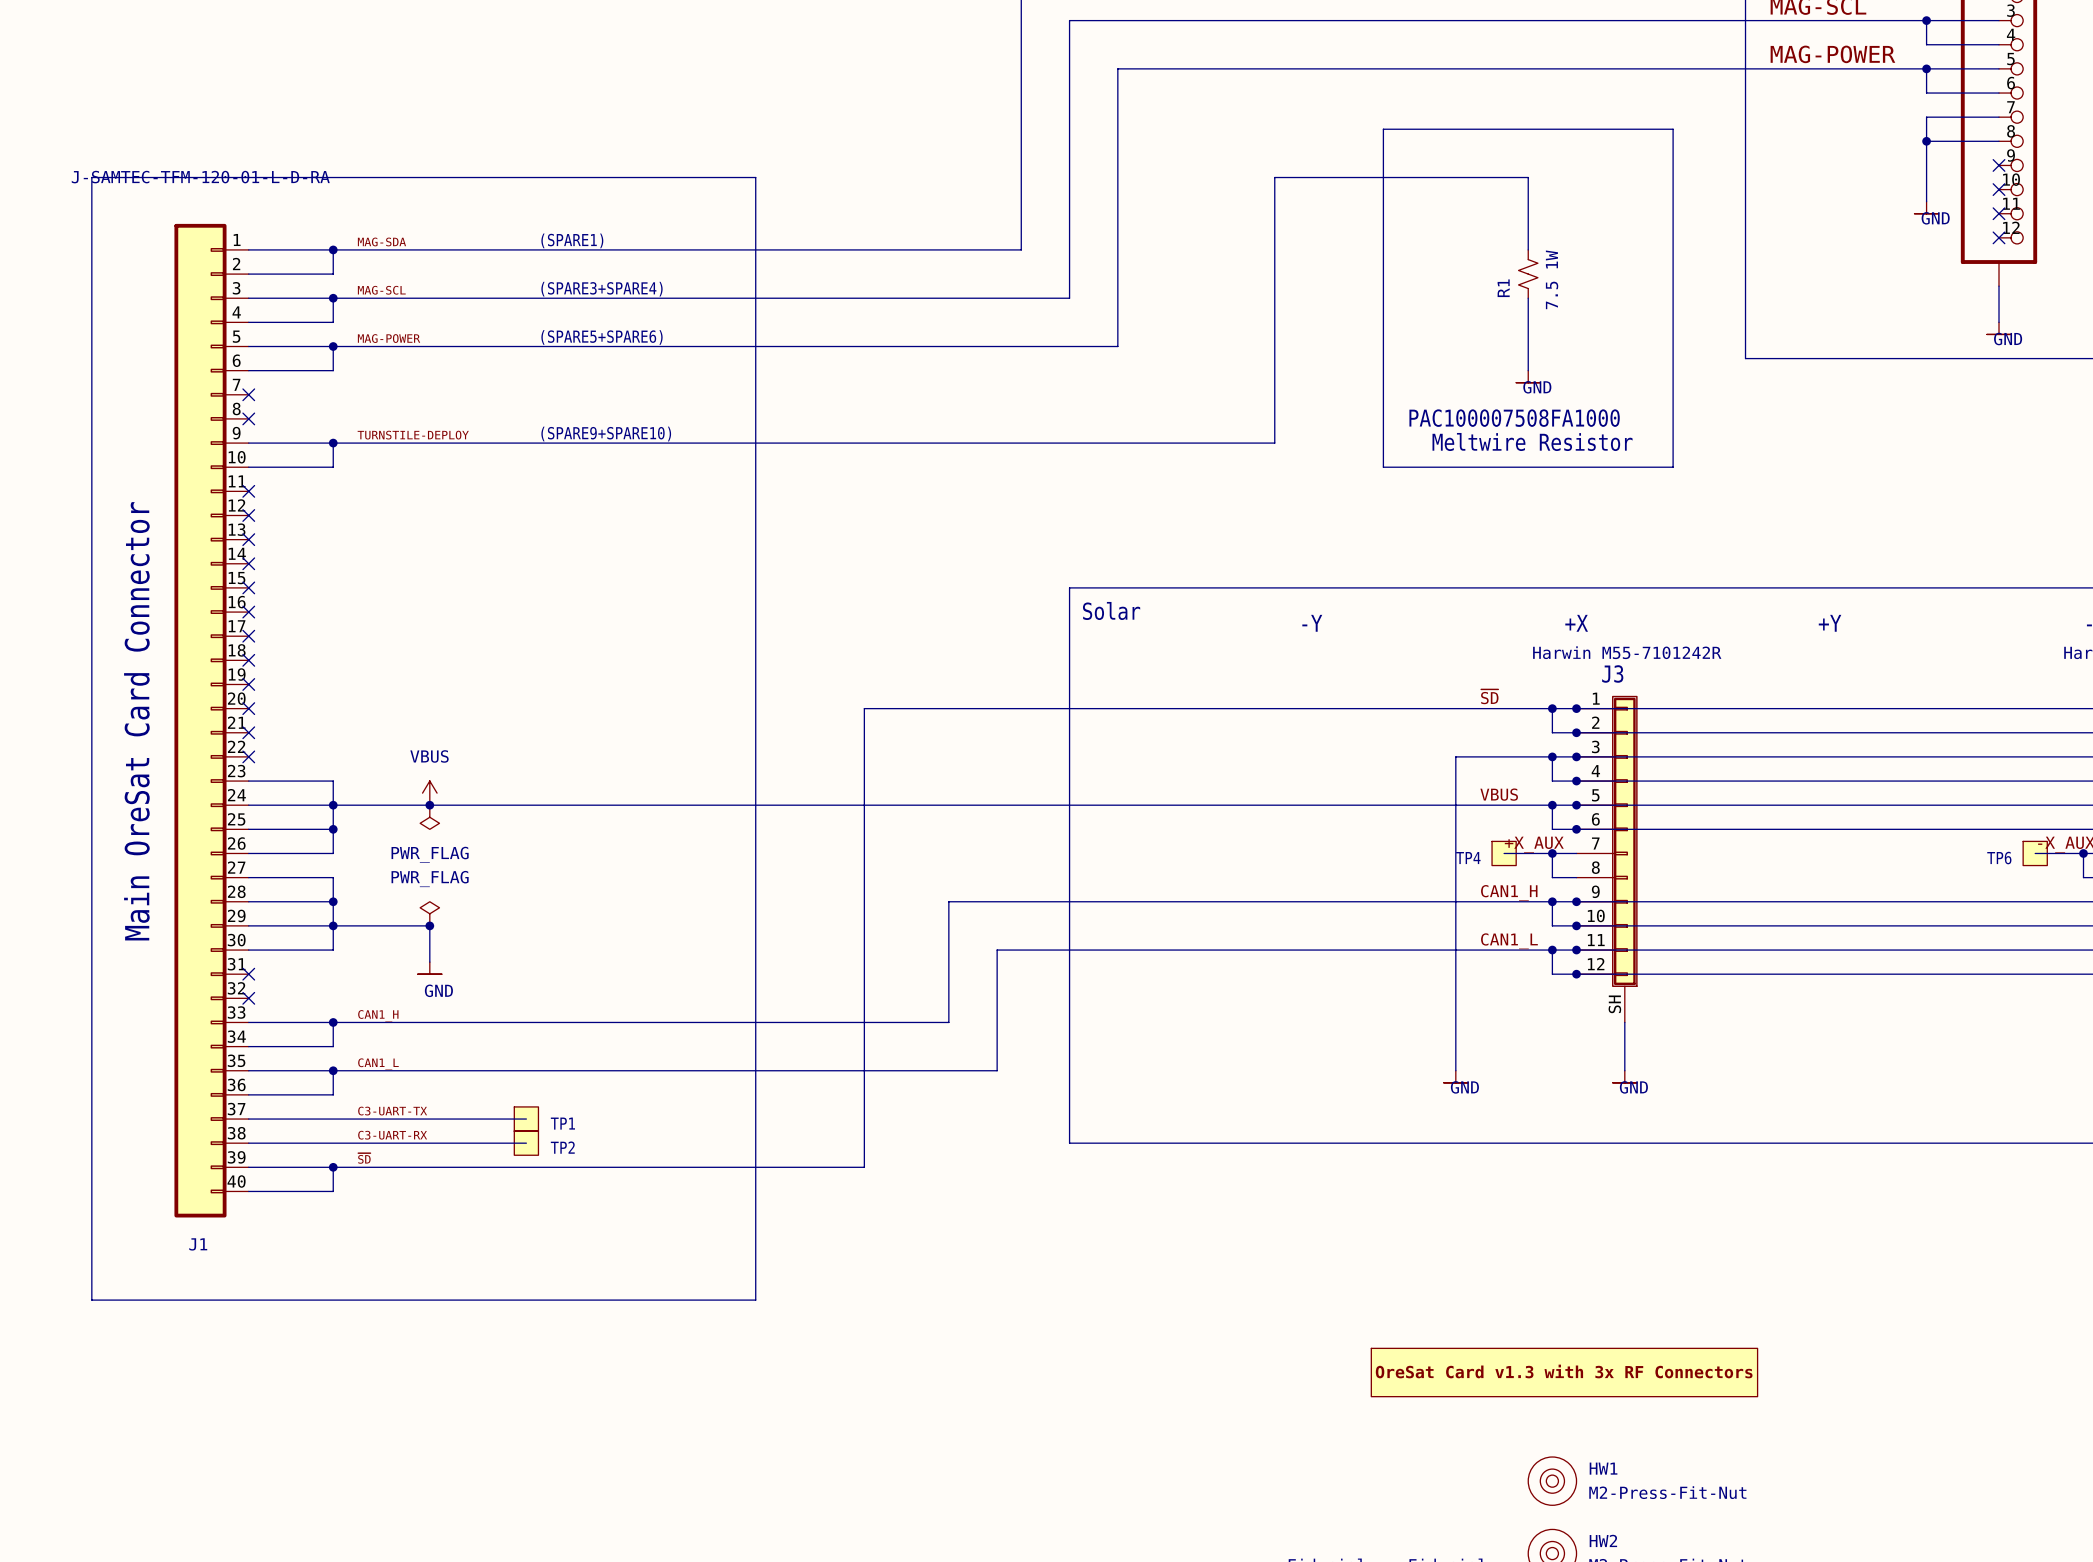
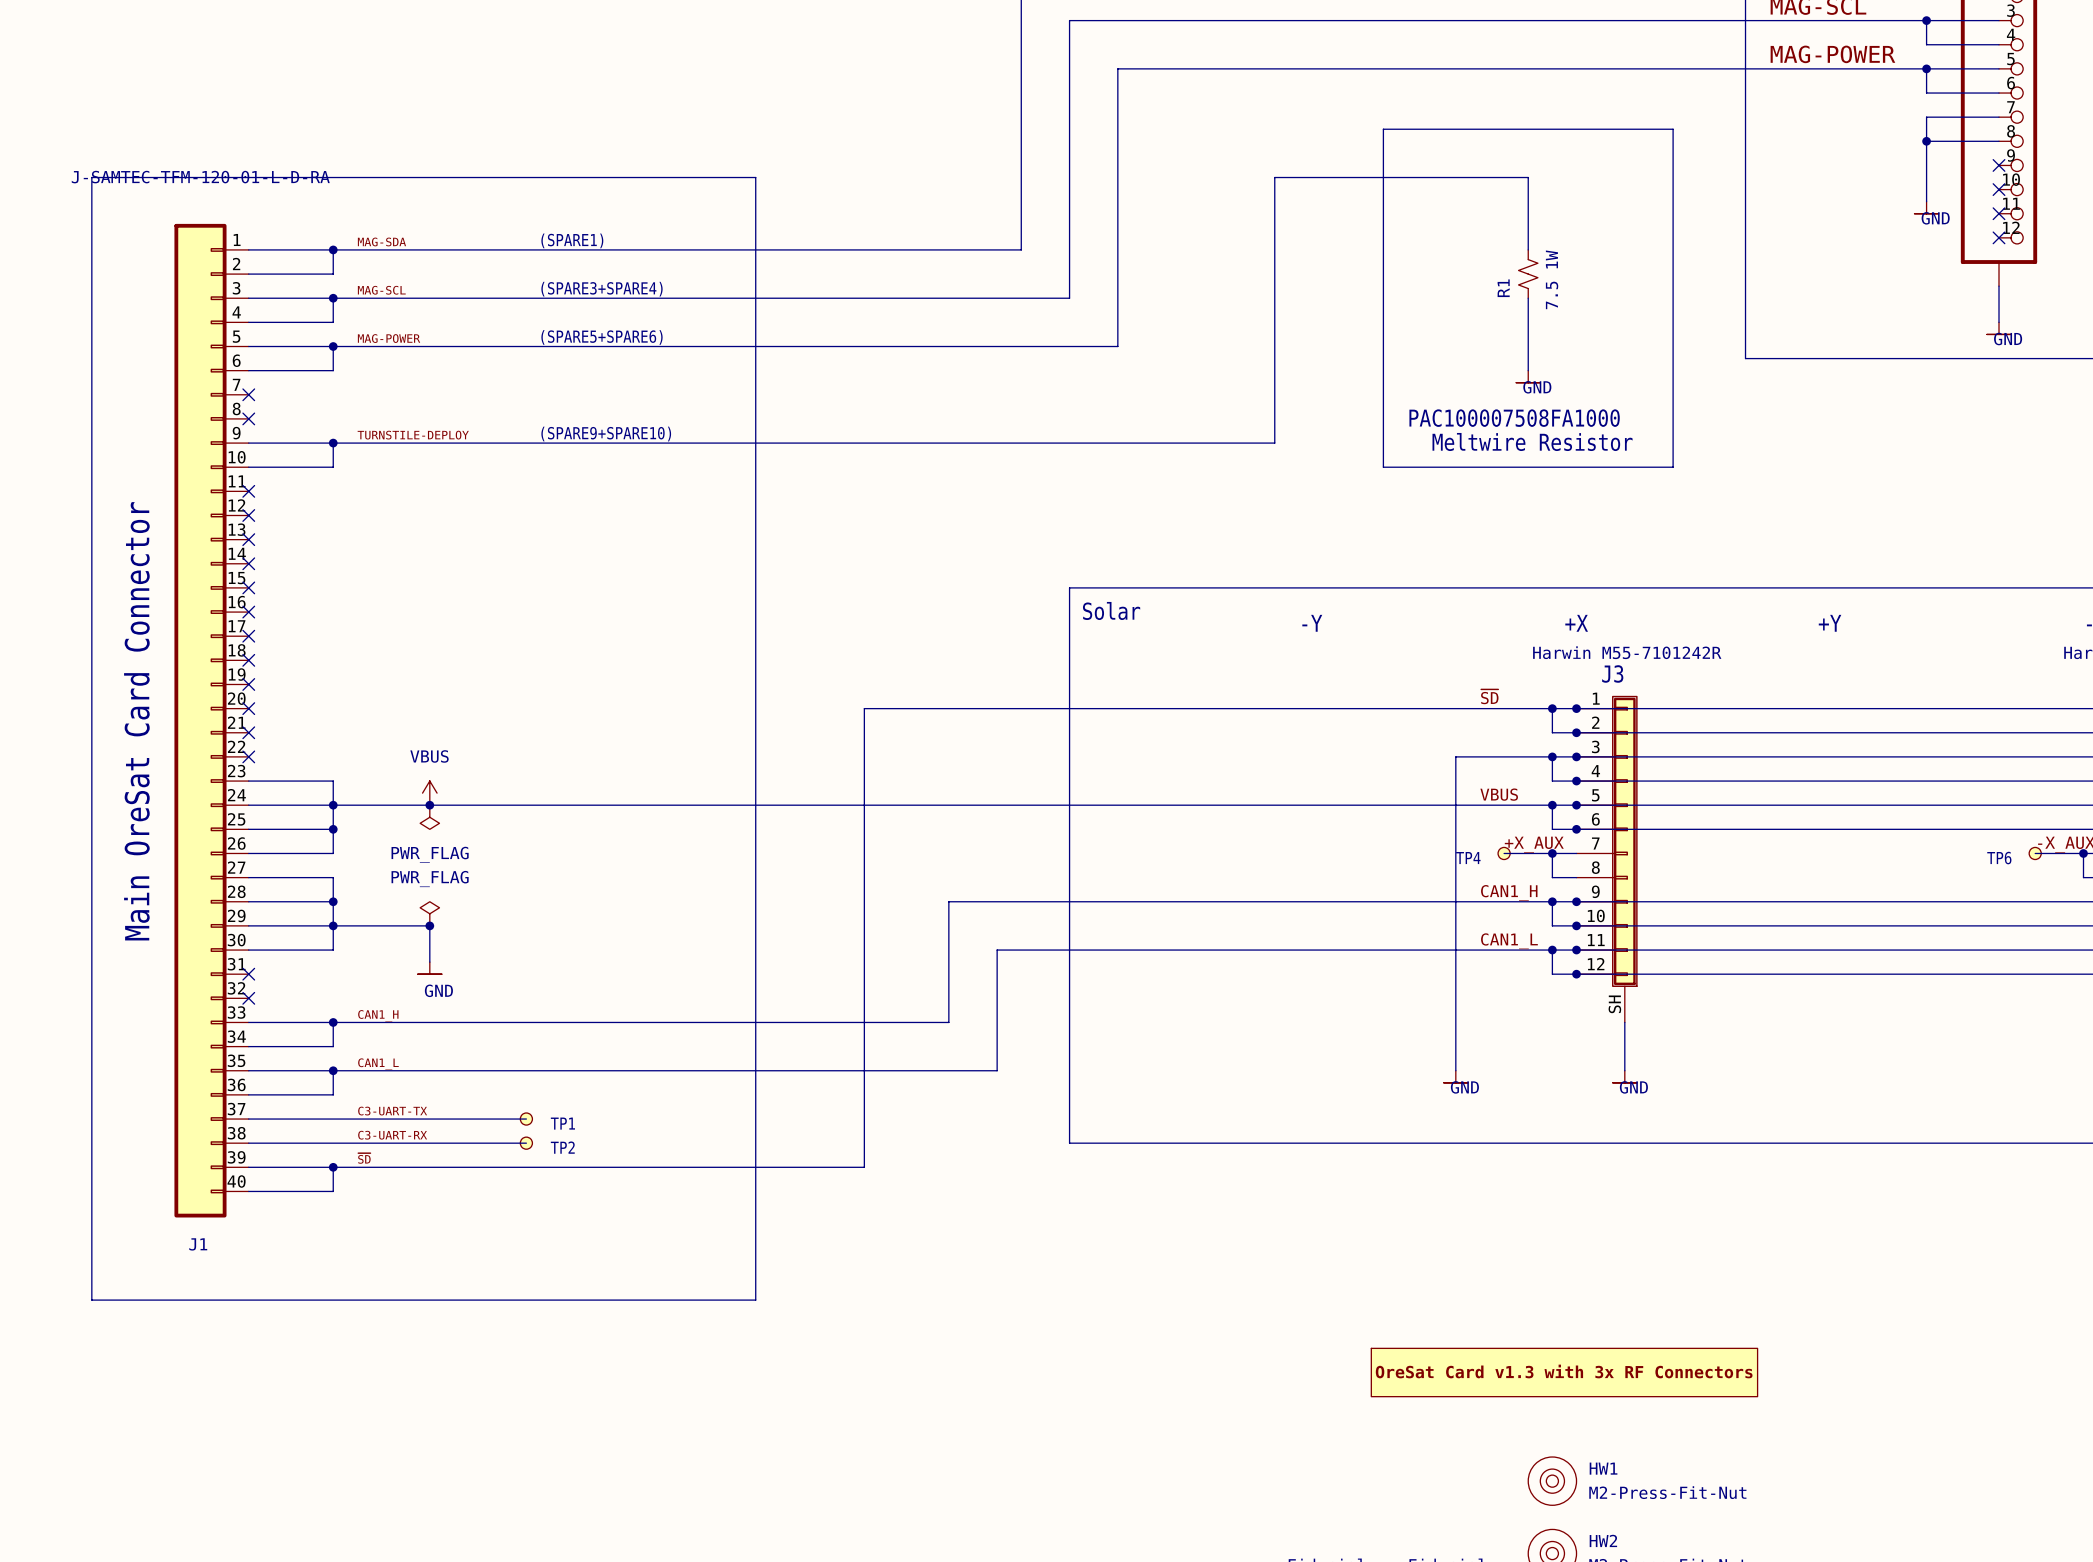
TP4 symbol: [1492, 841, 1517, 866] -> [1498, 847, 1511, 860]
TP6 symbol: [2023, 841, 2048, 866] -> [2029, 847, 2042, 860]
TP1 symbol: [514, 1106, 539, 1132] -> [520, 1112, 533, 1126]
TP2 symbol: [514, 1131, 539, 1156] -> [520, 1137, 533, 1150]

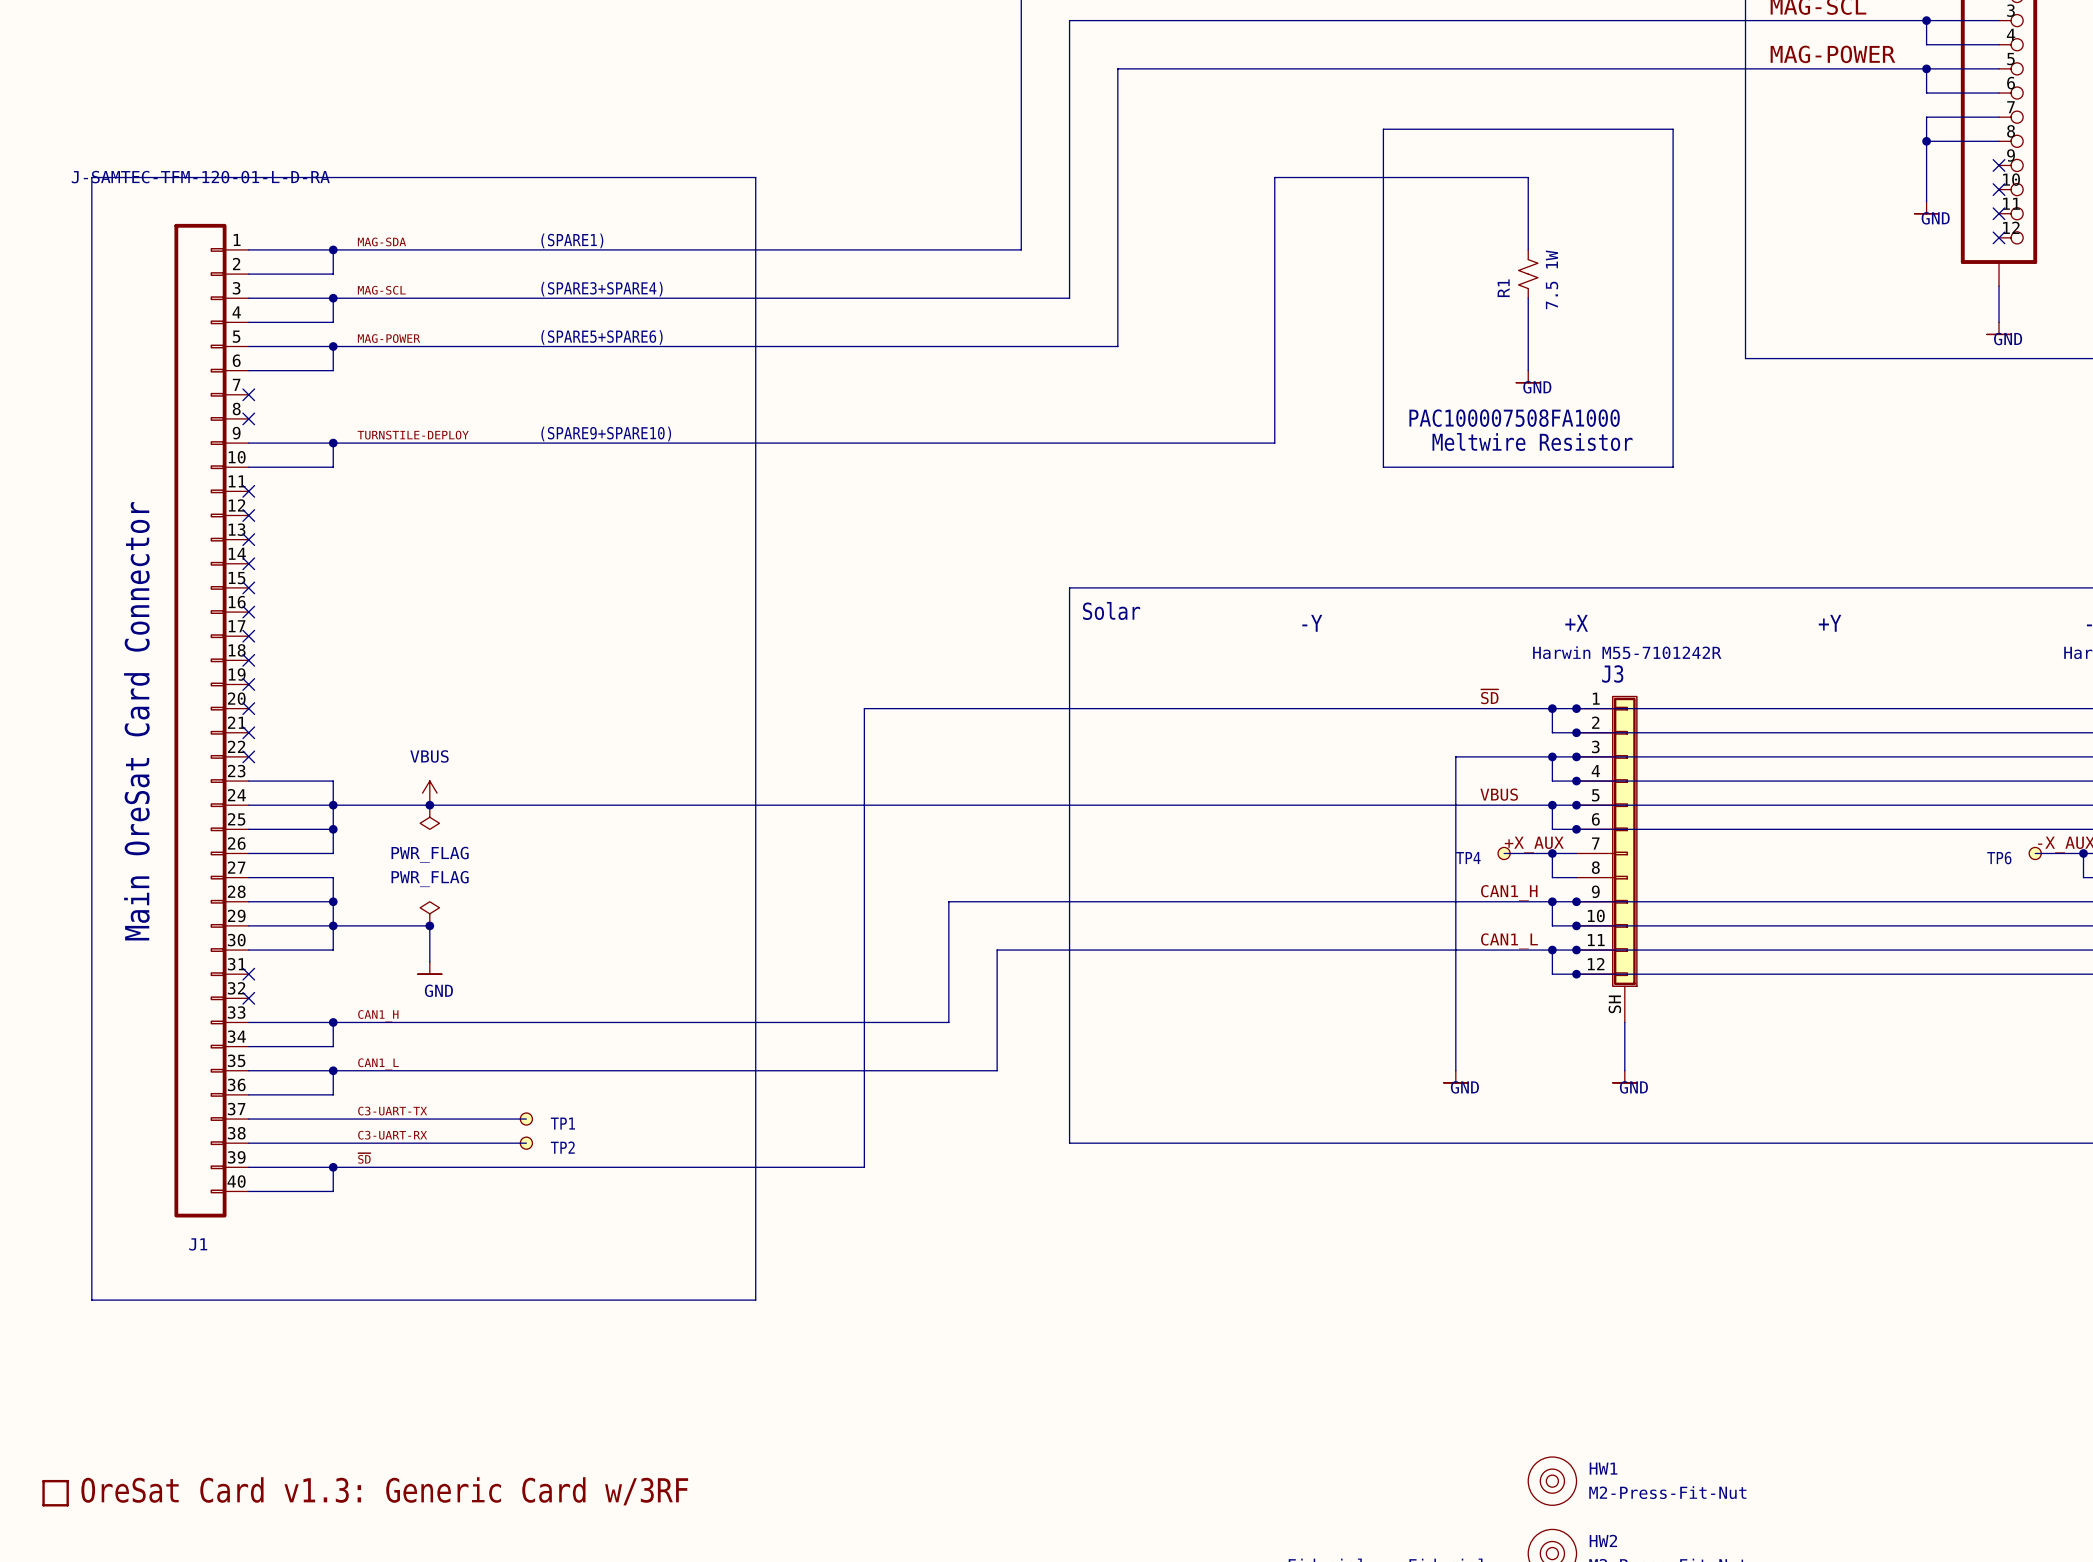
J1 symbol: [174, 223, 249, 1218] -> [174, 223, 249, 1218]
part: (1564, 1372) -> none
part: none -> (55, 1493)

